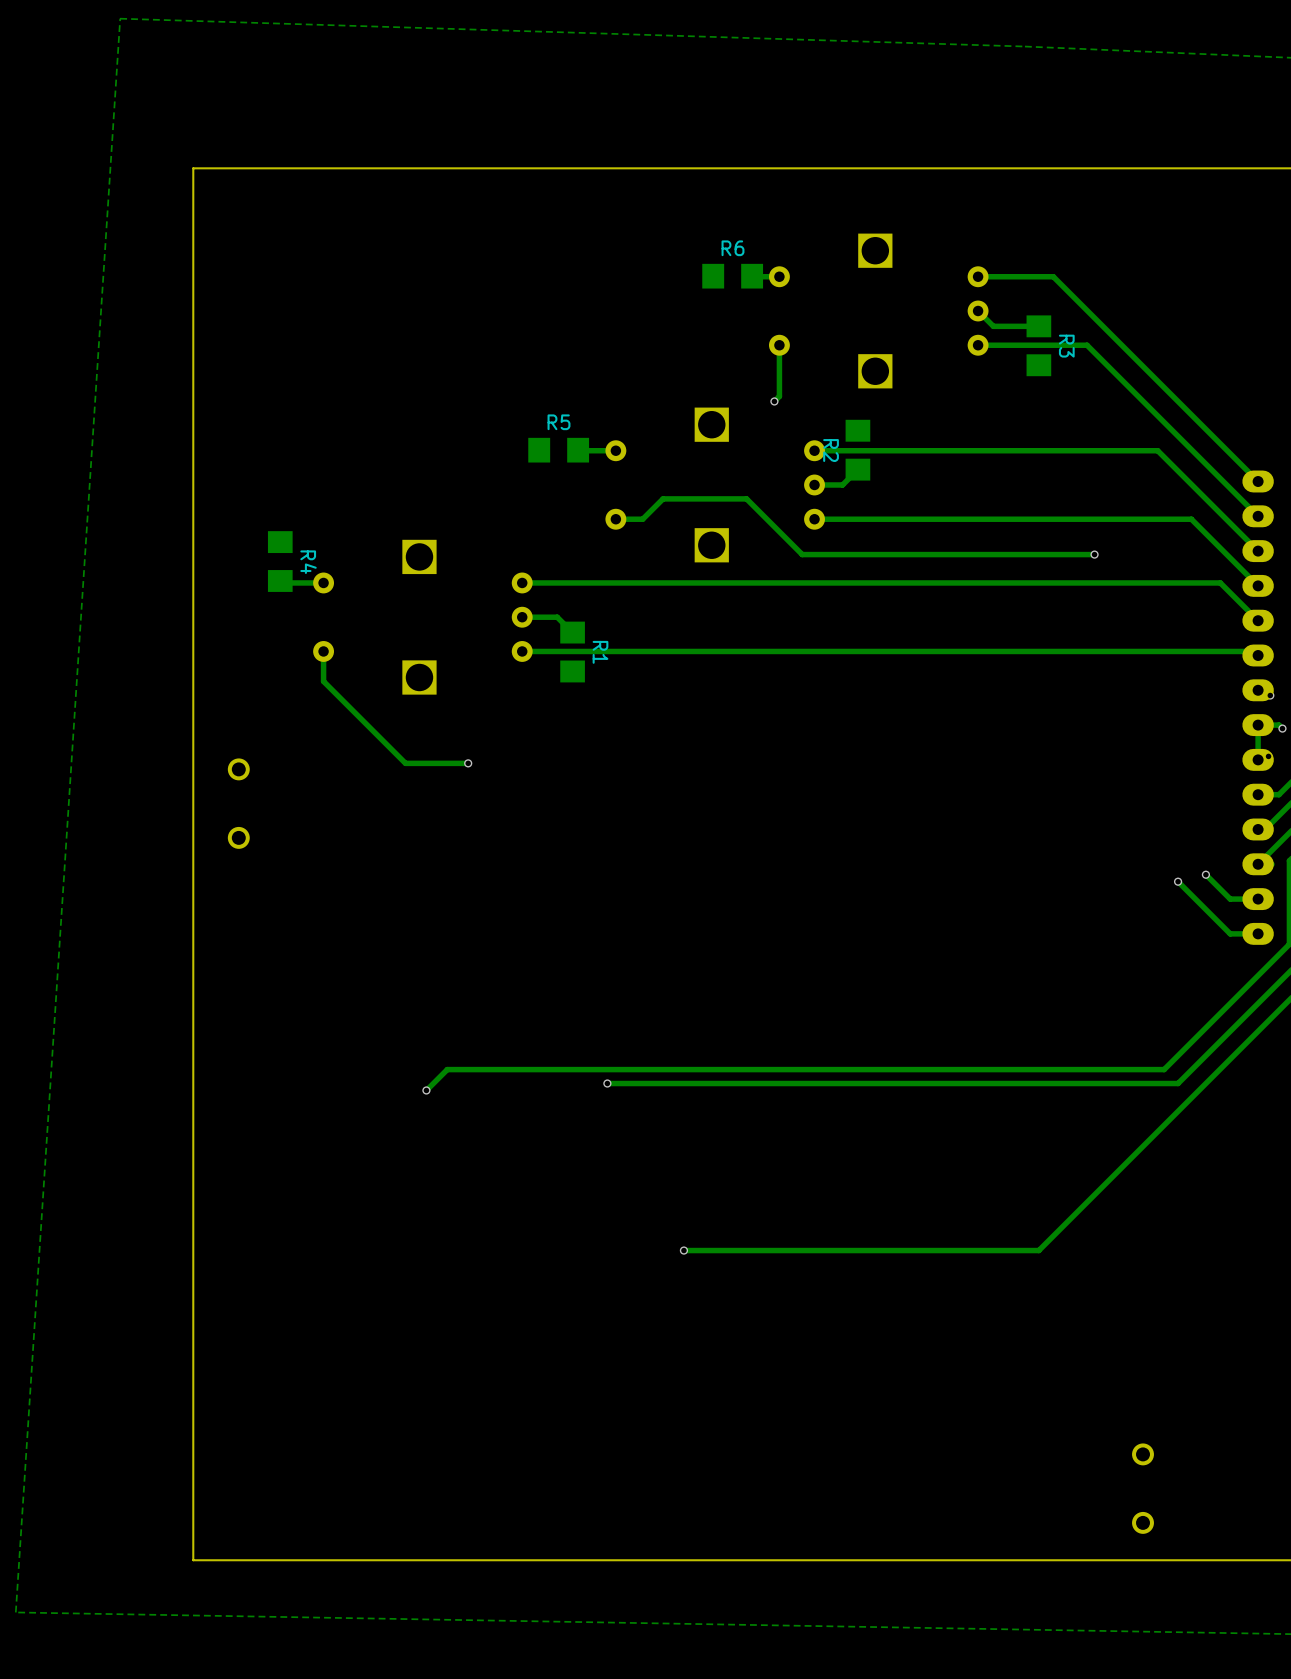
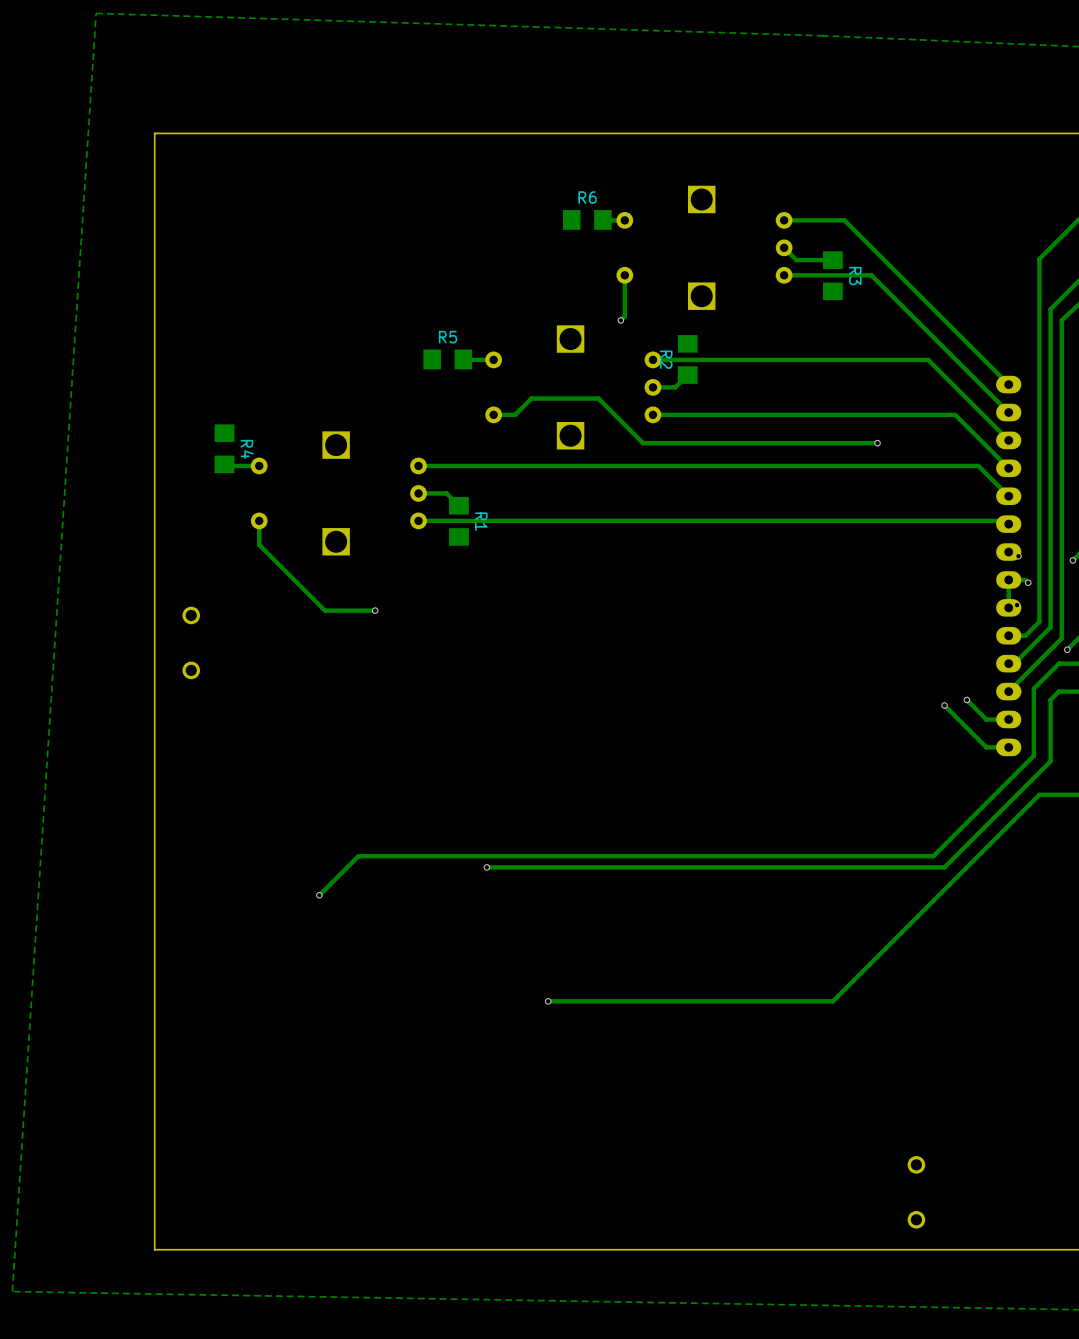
track: none -> (341, 872) (319, 895)
via position: (426, 1090) -> (319, 895)

